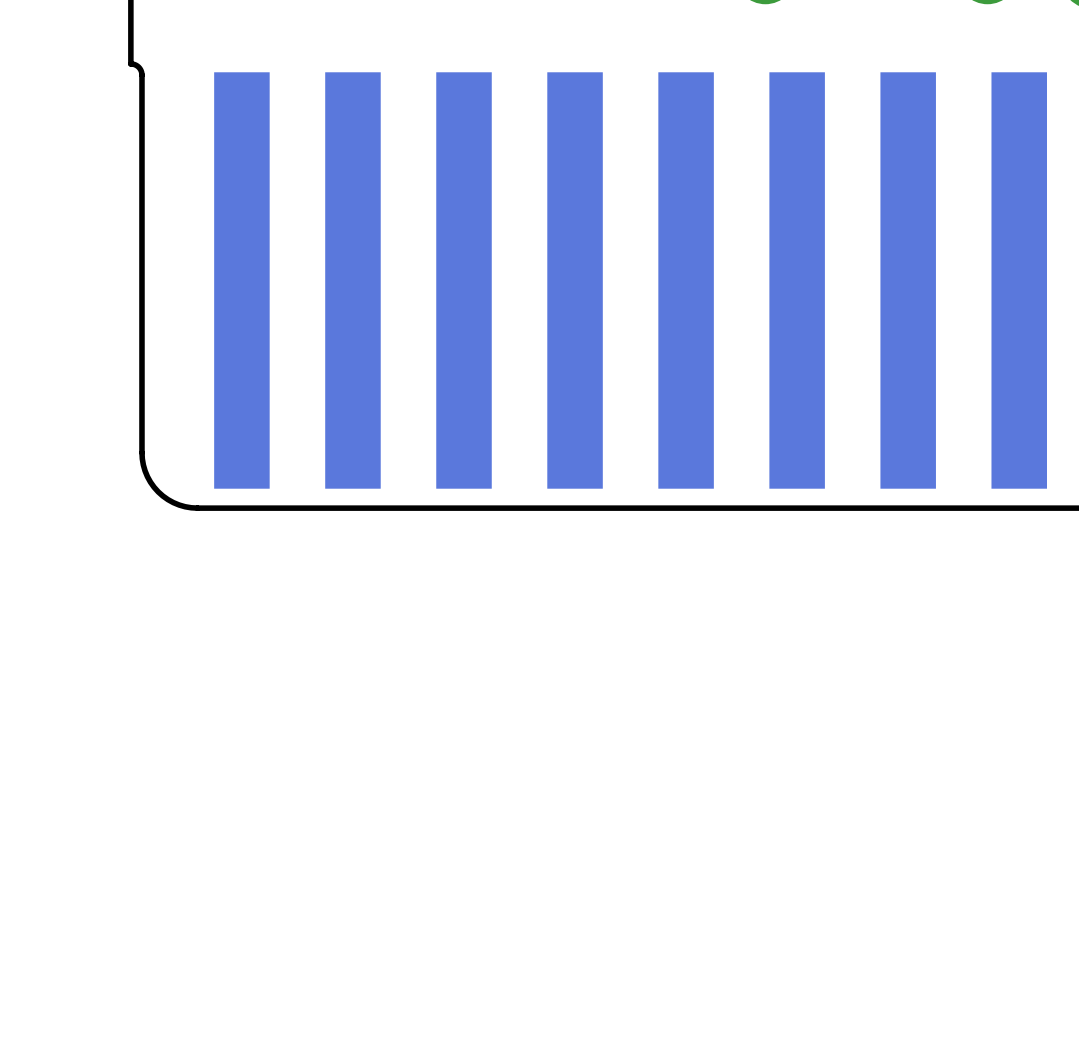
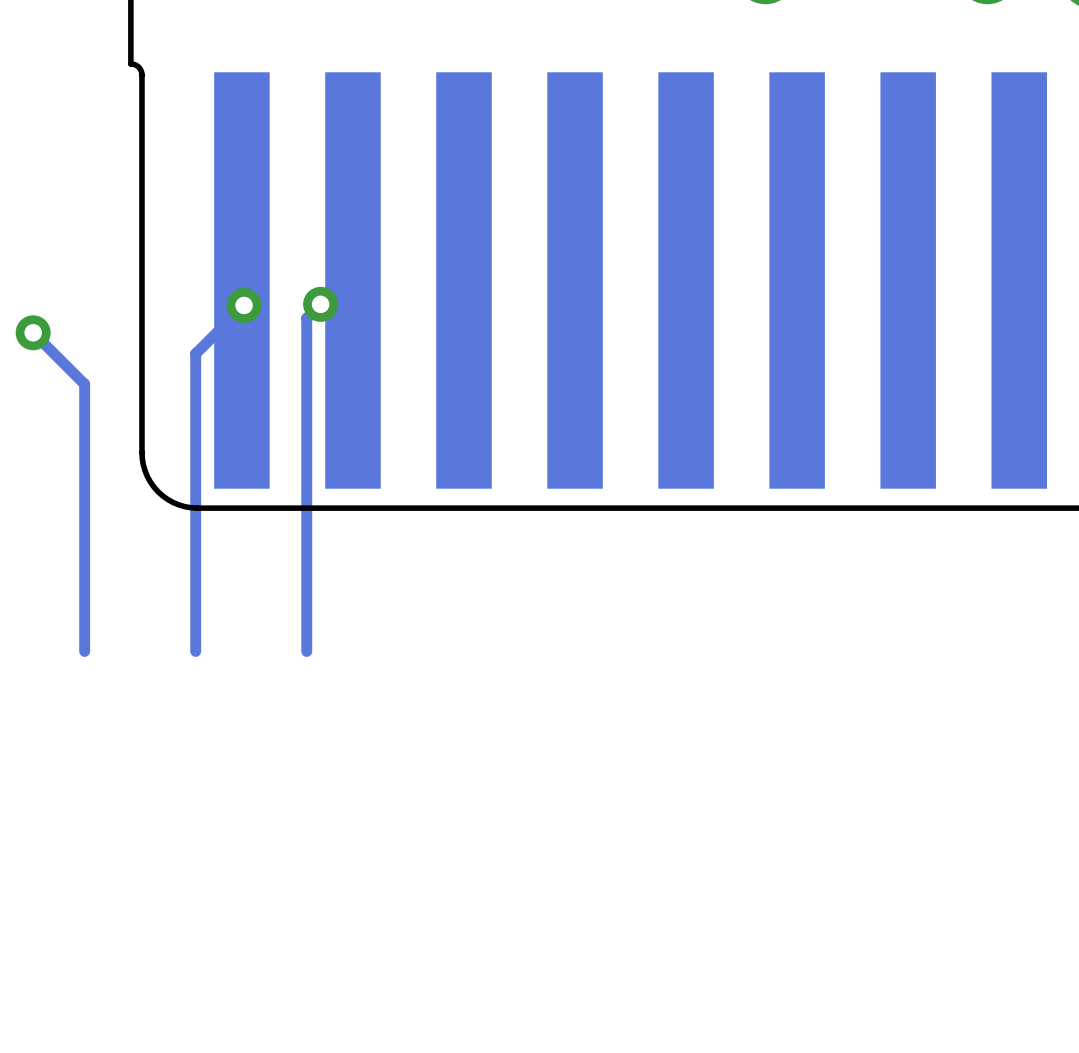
track: none -> (320, 304) (306, 318) (306, 651)
via: none -> (320, 304)
track: none -> (244, 305) (195, 353) (195, 651)
via: none -> (244, 305)
track: none -> (33, 332) (84, 384) (84, 651)
via: none -> (33, 332)

